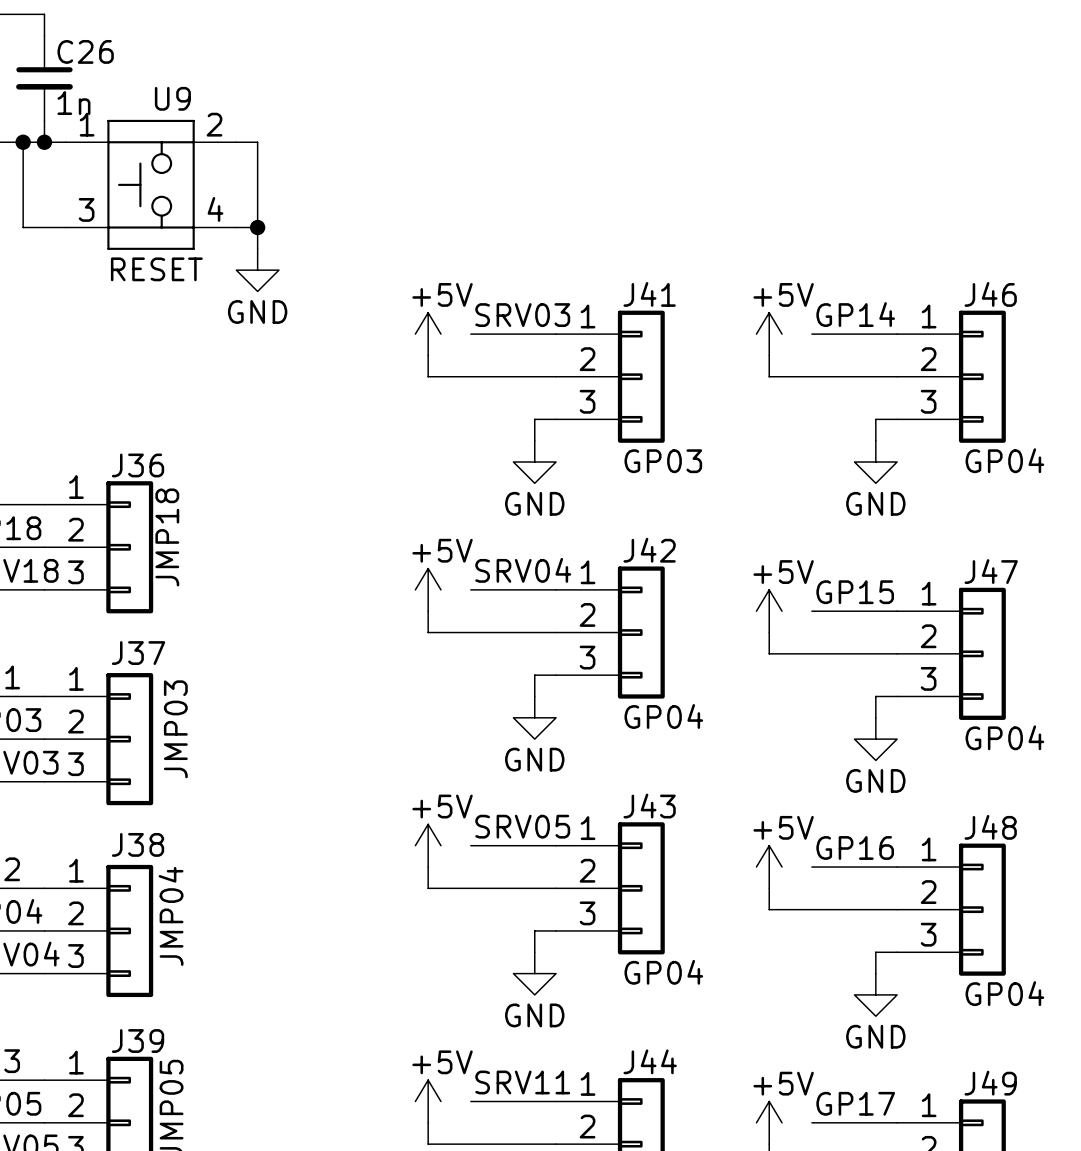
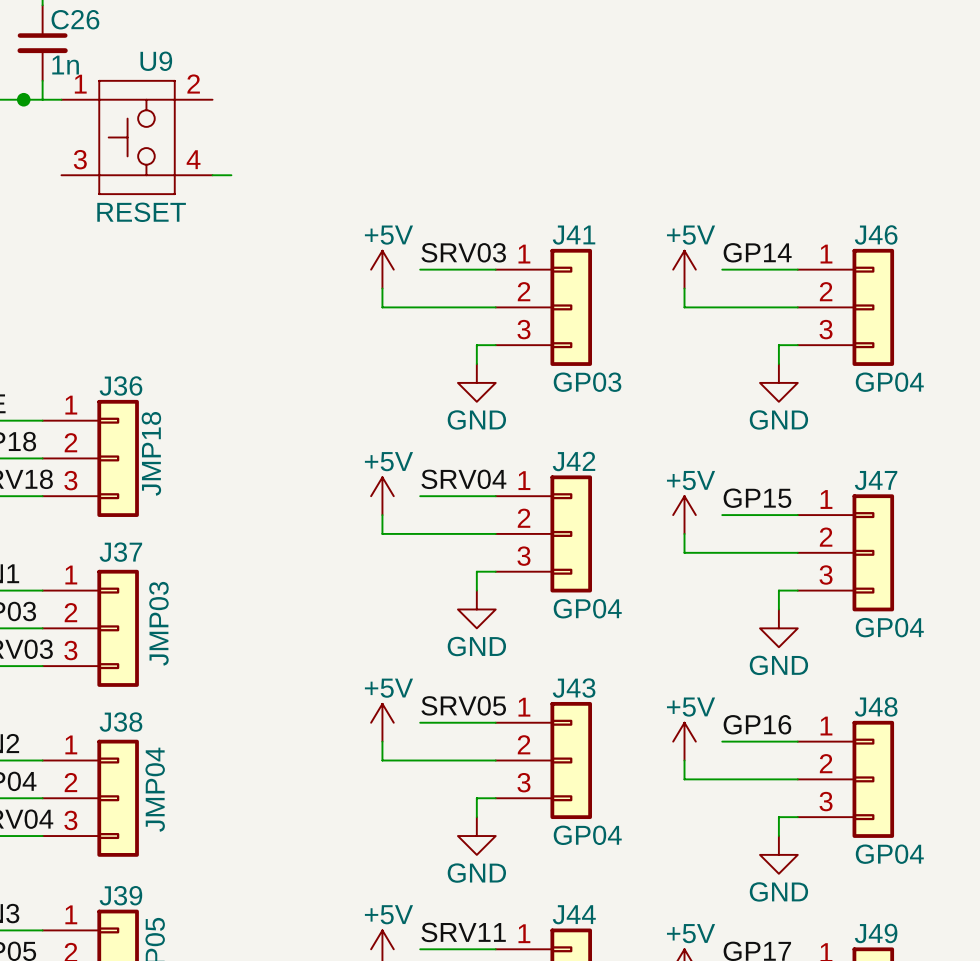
wire: (23, 142) (23, 227) (65, 227) -> none
junction: (44, 142) -> none
wire: (236, 142) (257, 142) (257, 248) -> none
junction: (257, 227) -> none
power symbol: GND (257, 270) -> none

